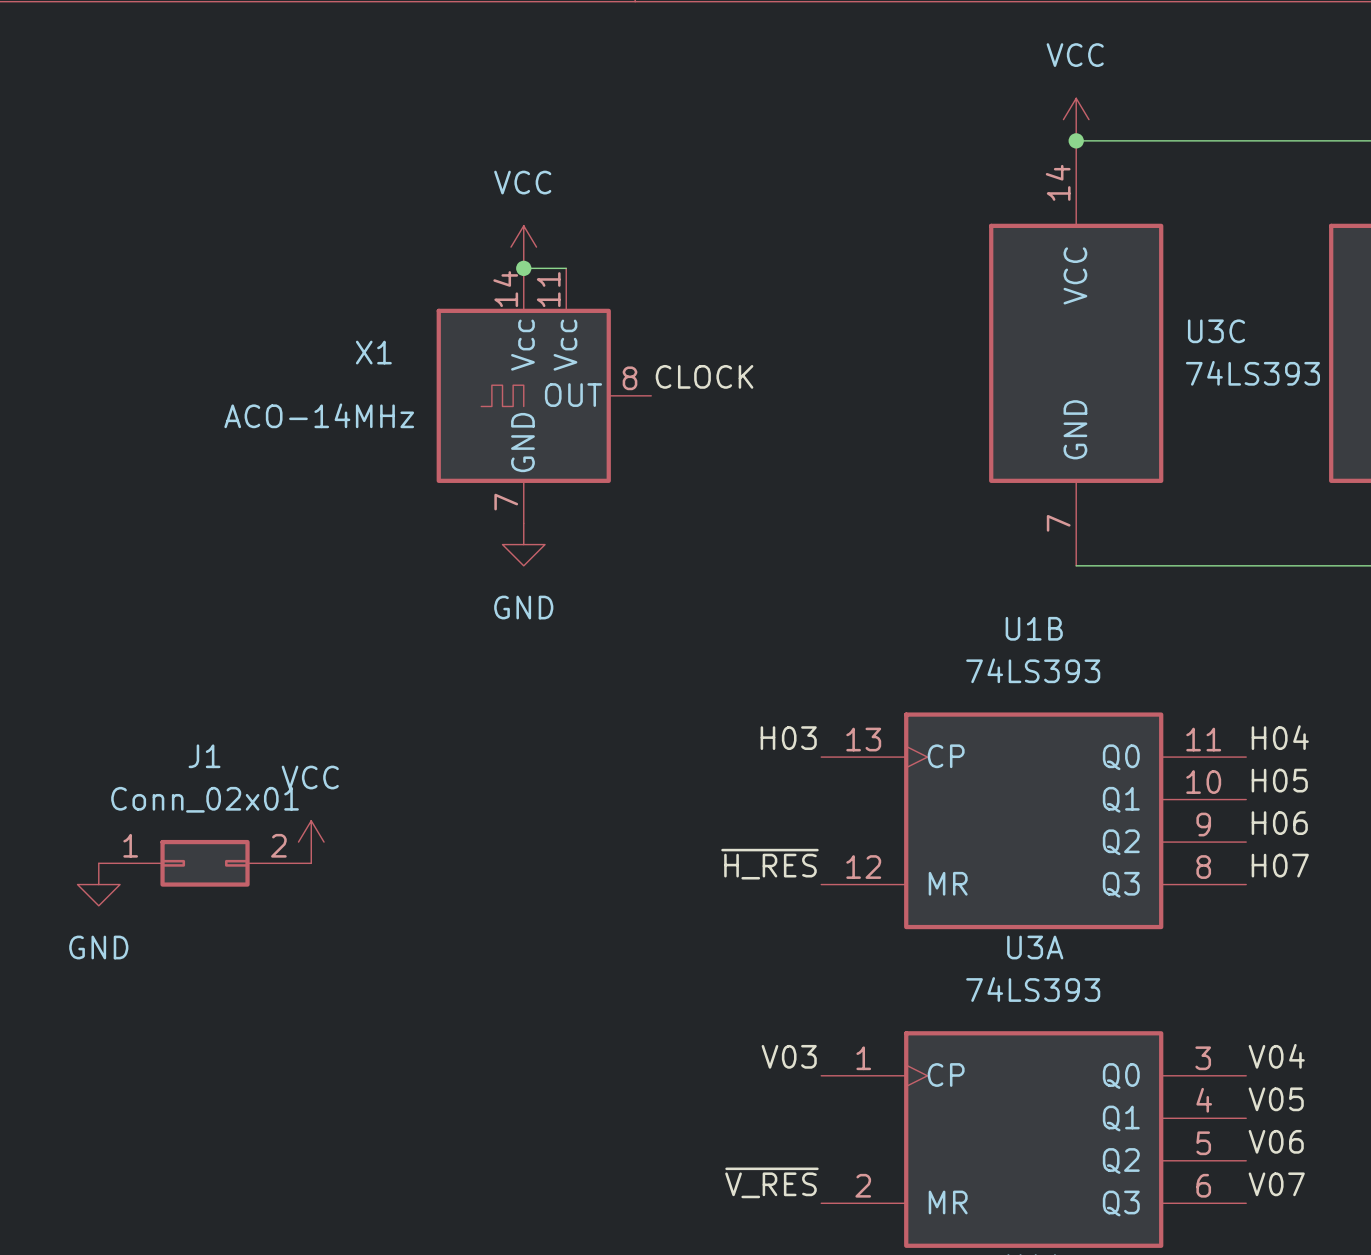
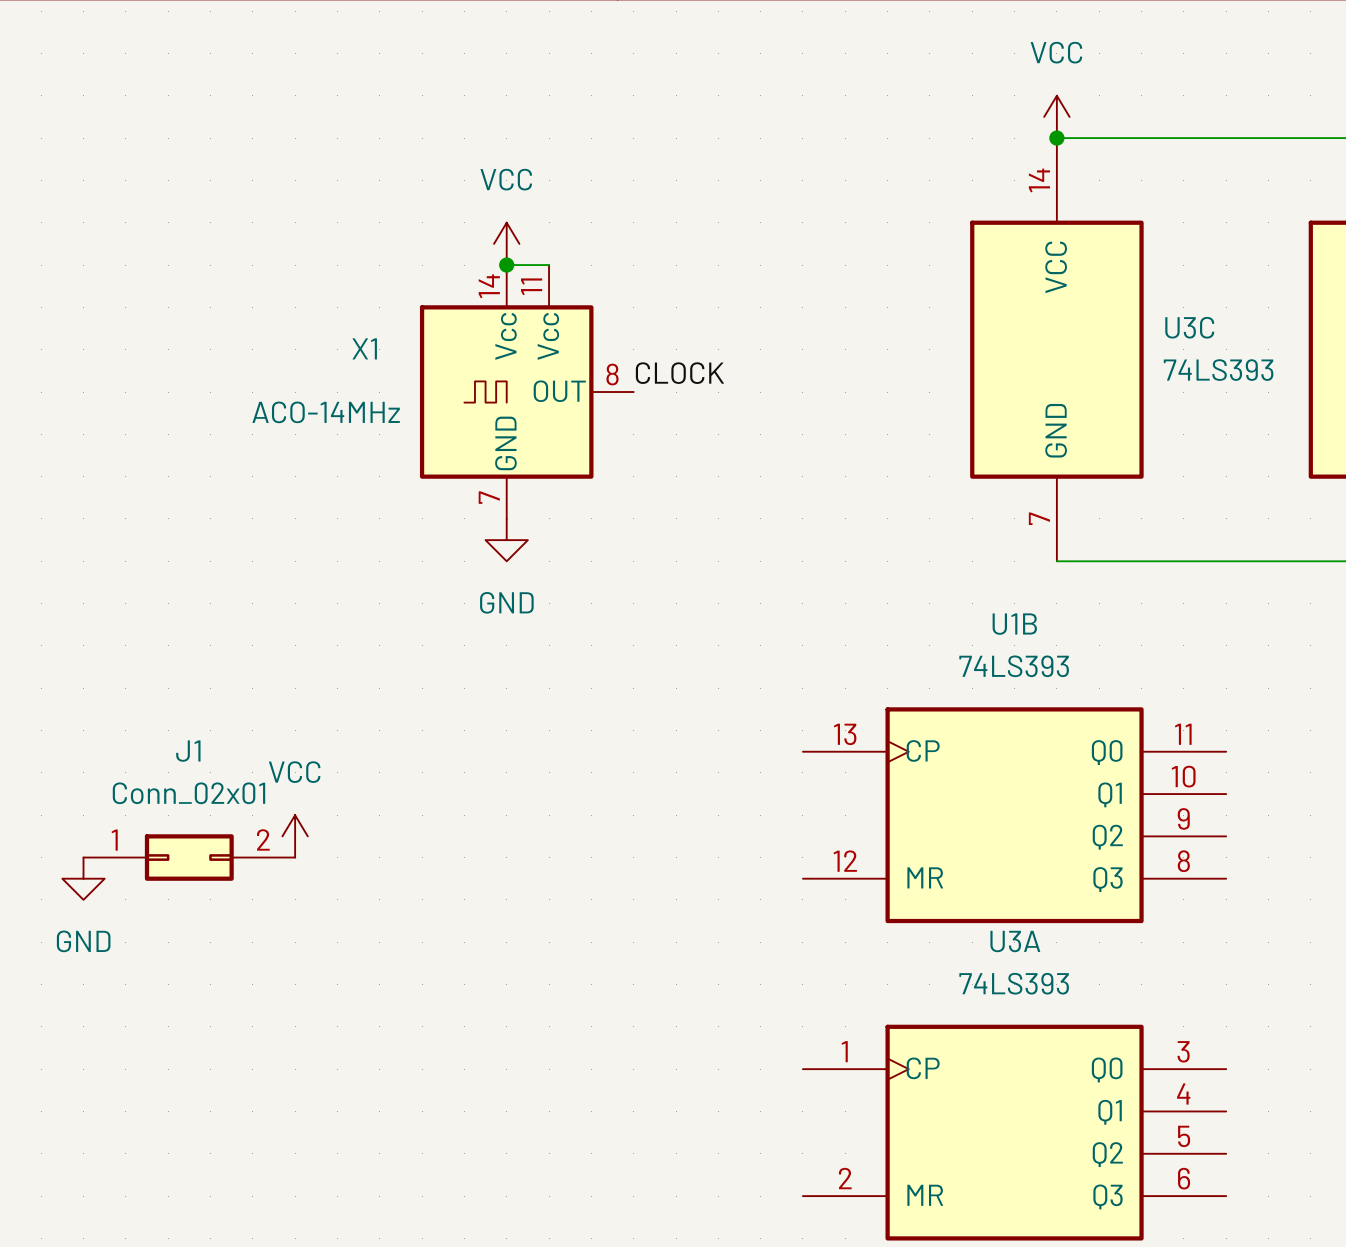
label: H04 (1280, 737) -> none
label: H03 (788, 738) -> none
label: H05 (1279, 780) -> none
label: H06 (1279, 823) -> none
label: ~{H_RES} (769, 864) -> none
label: H07 (1280, 865) -> none
label: V03 (789, 1056) -> none
label: V04 (1276, 1056) -> none
label: V05 (1276, 1099) -> none
label: V06 (1276, 1141) -> none
label: ~{V_RES} (771, 1182) -> none
label: V07 (1276, 1184) -> none

